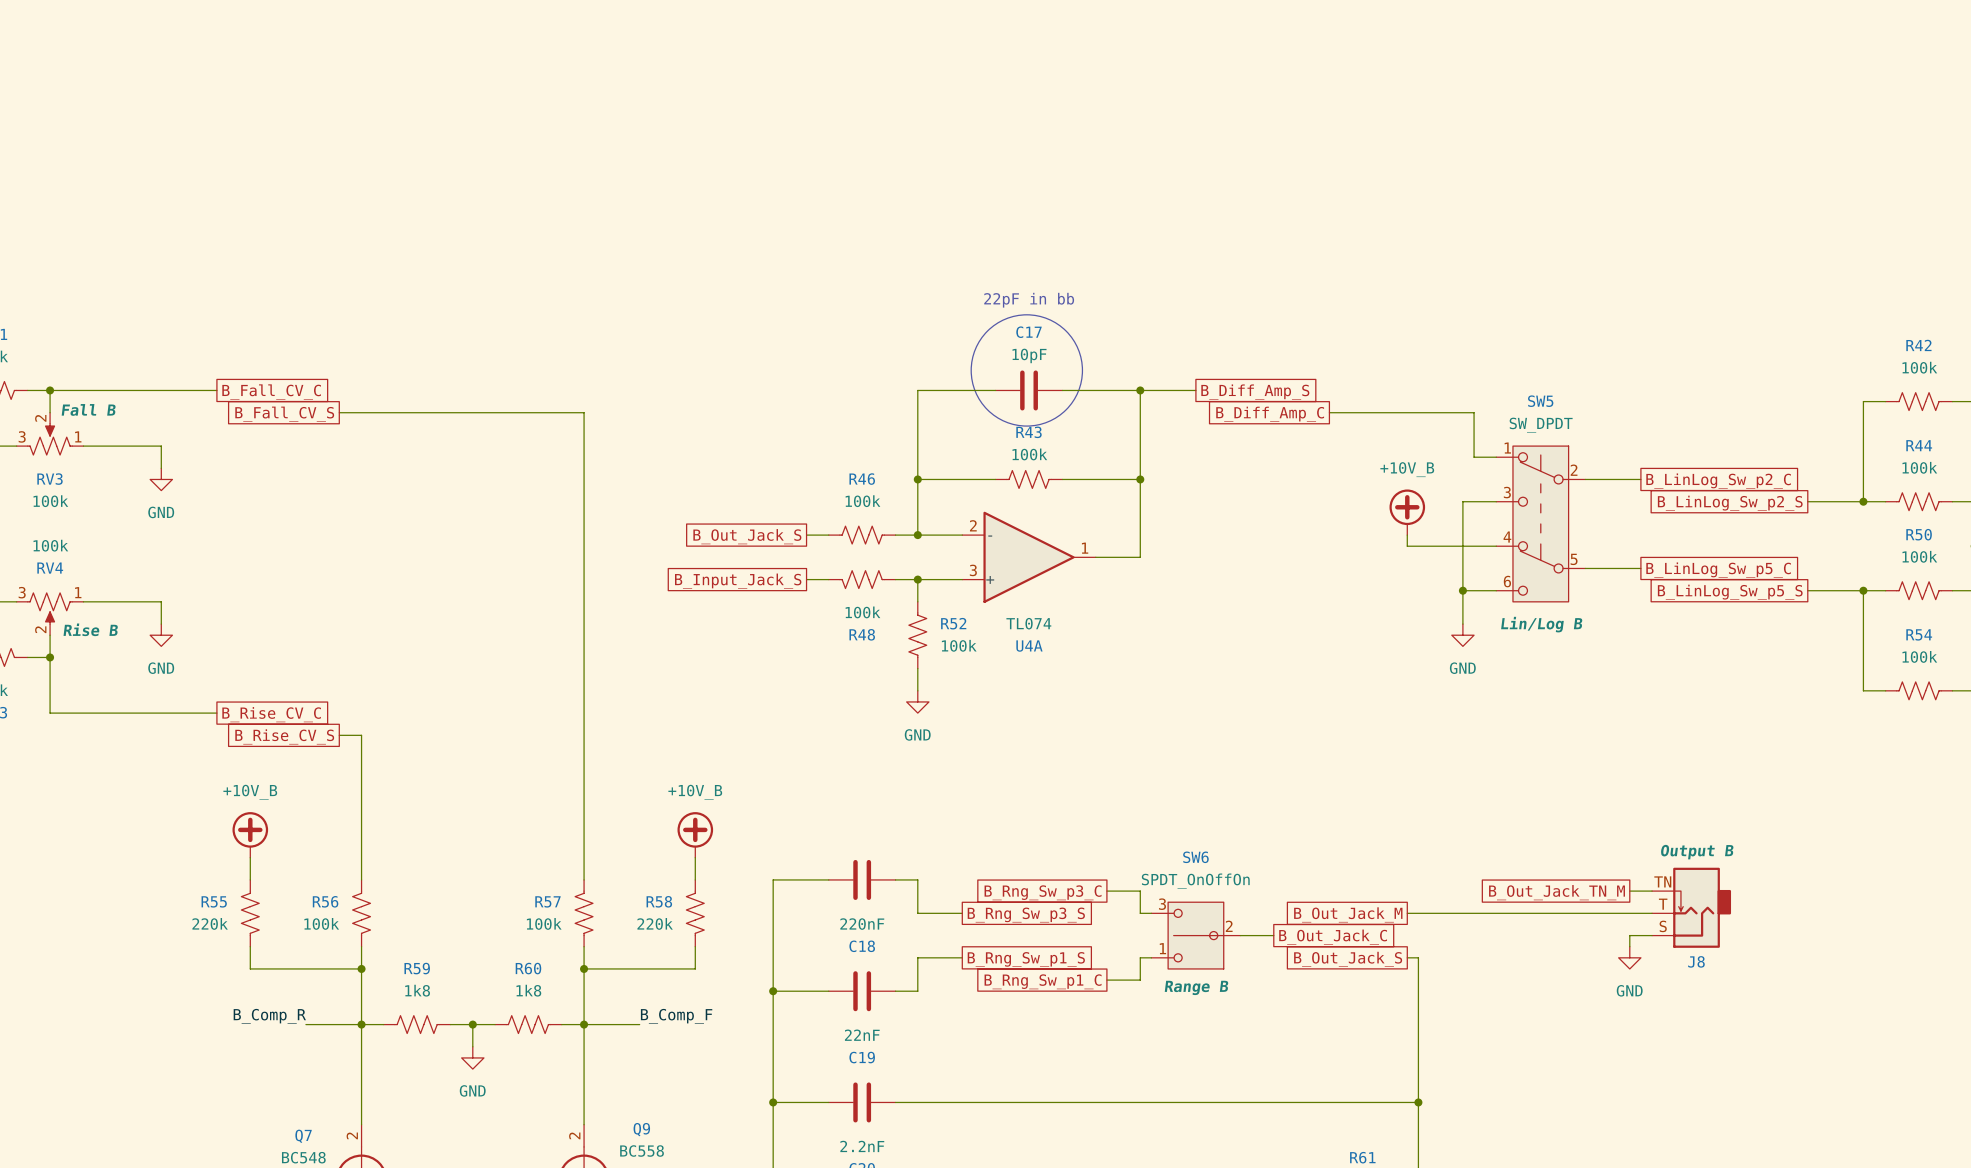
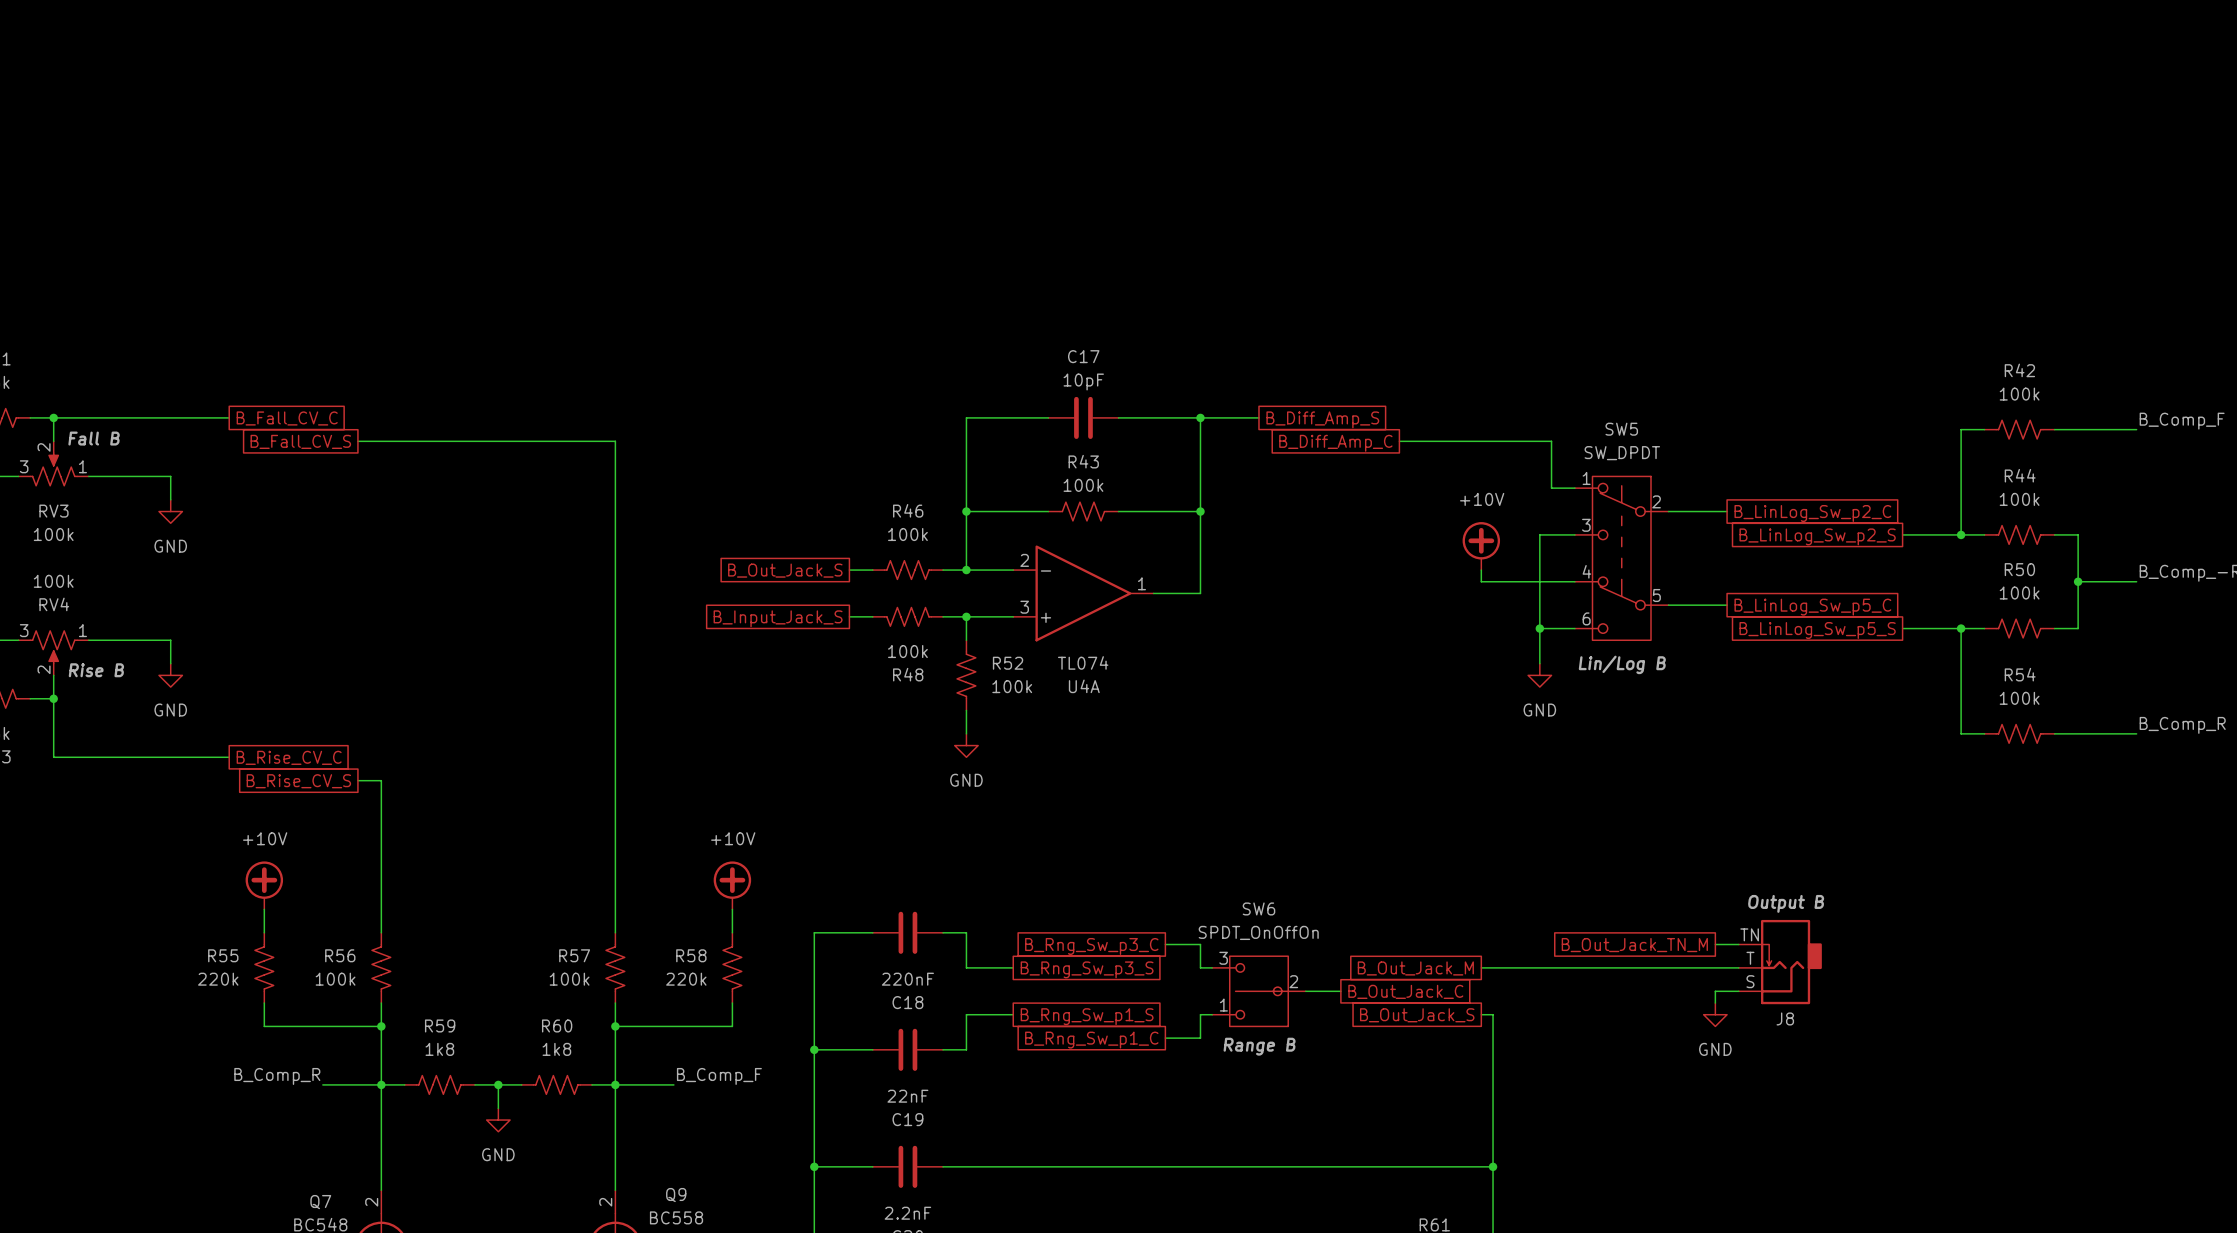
text: 22pF in bb (1029, 300) -> none
drawing: [971, 314, 1083, 427] -> none
power symbol: +10V_B (1407, 512) -> +10V (1481, 546)
power symbol: +10V_B (250, 834) -> +10V (264, 885)
power symbol: +10V_B (695, 834) -> +10V (732, 885)

